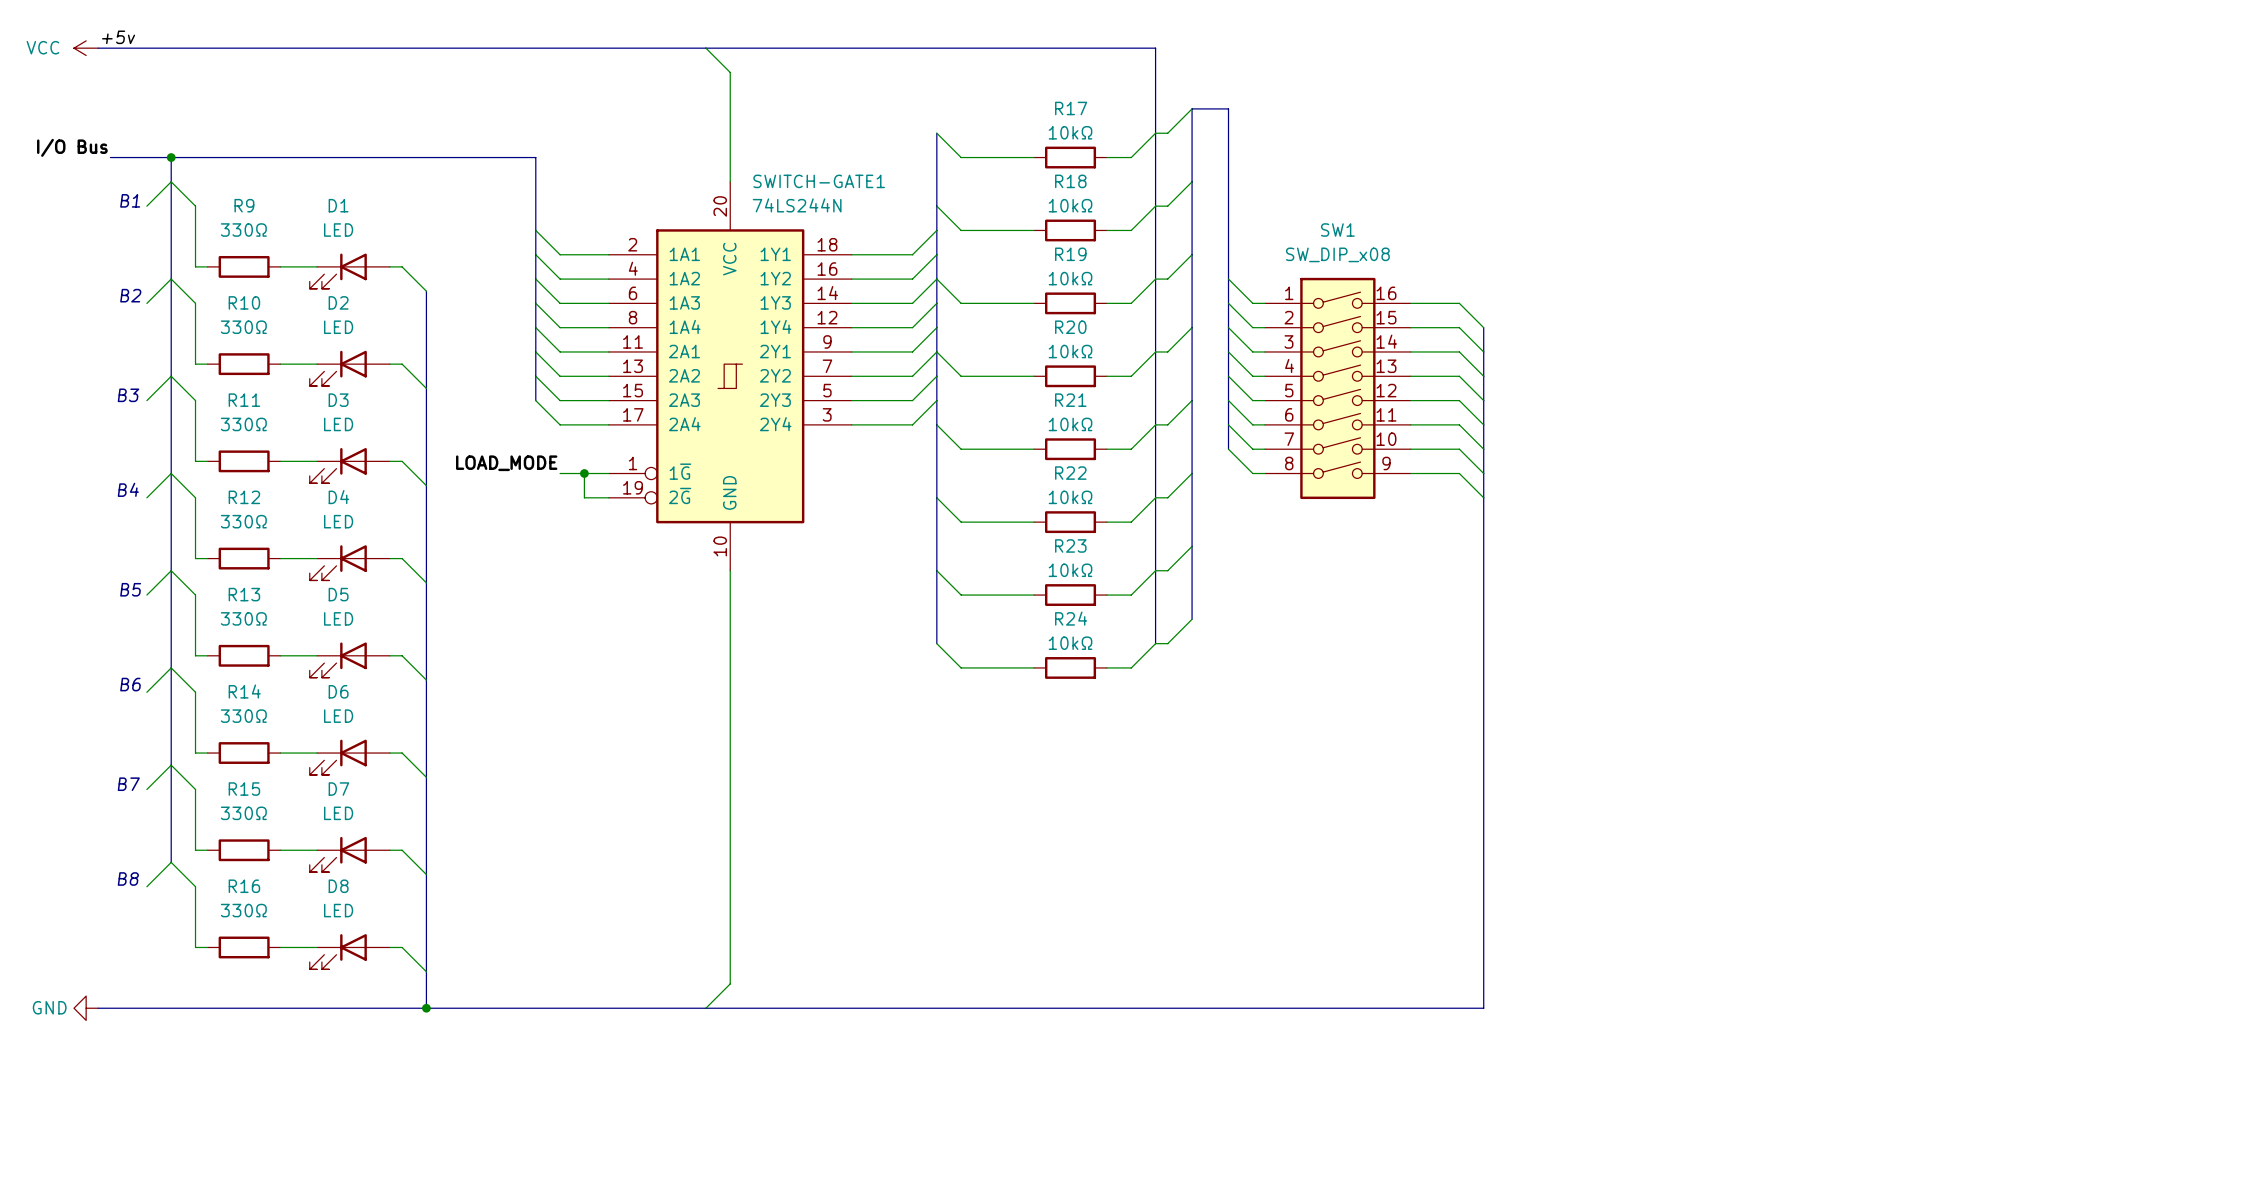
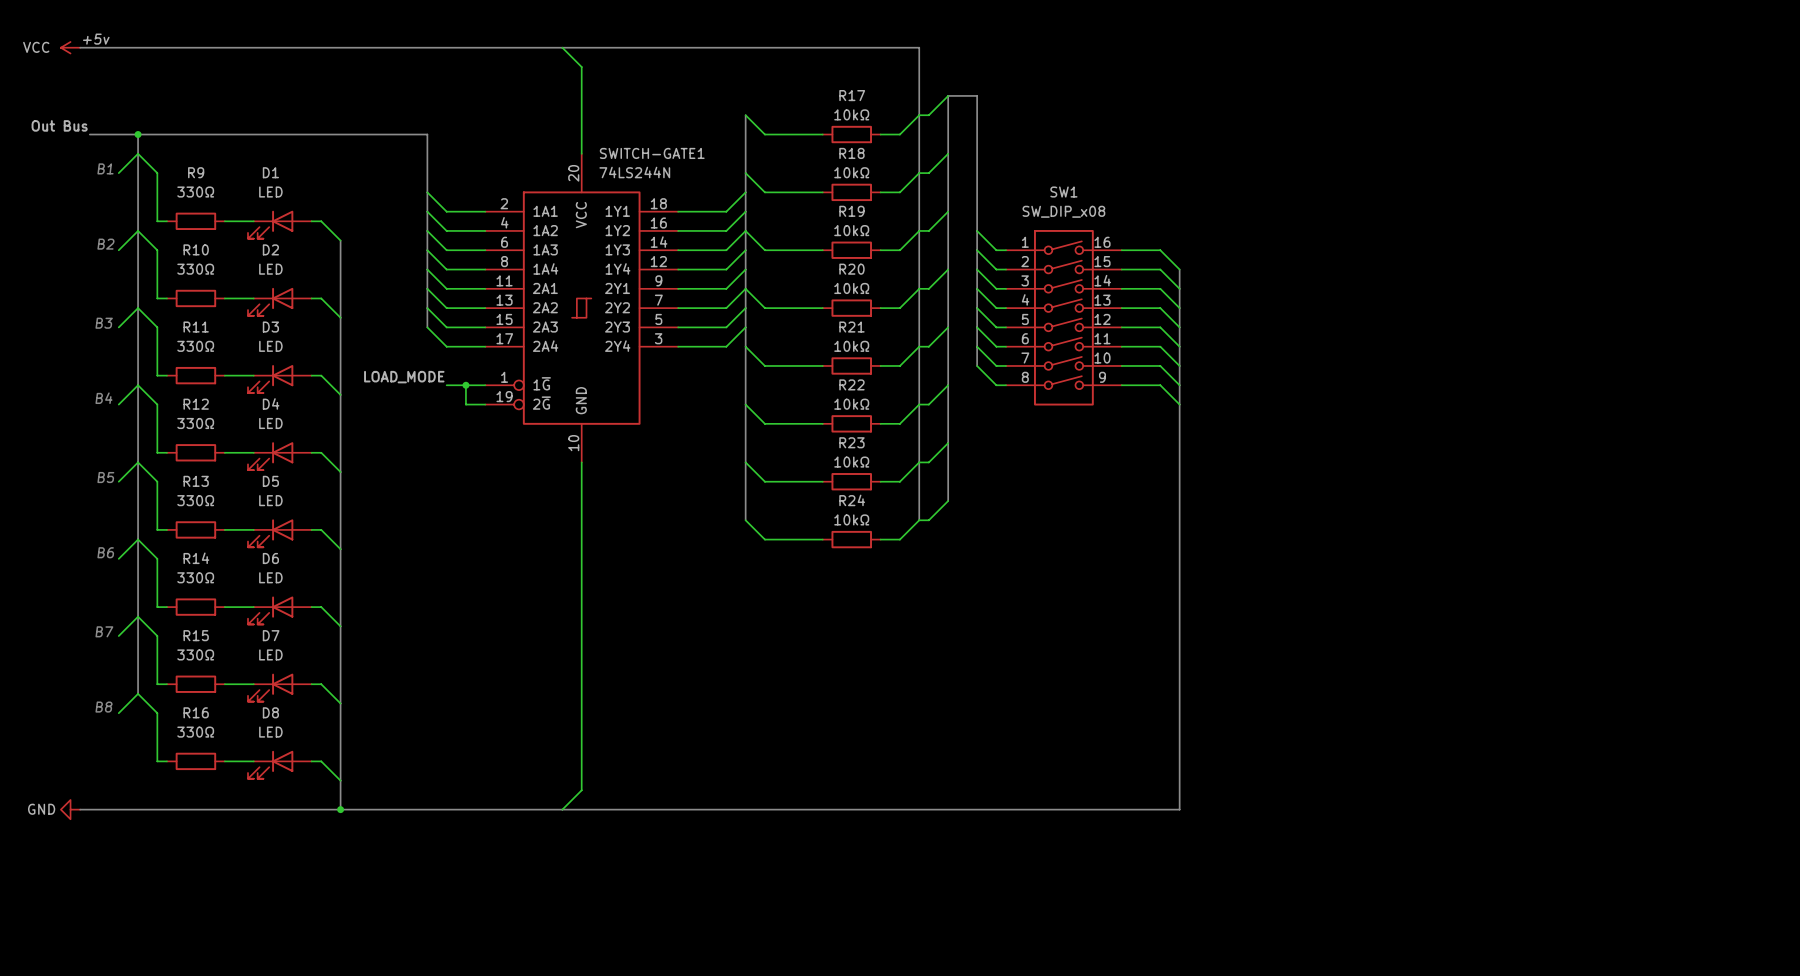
label: I/O Bus (72, 147) -> Out Bus (59, 125)

